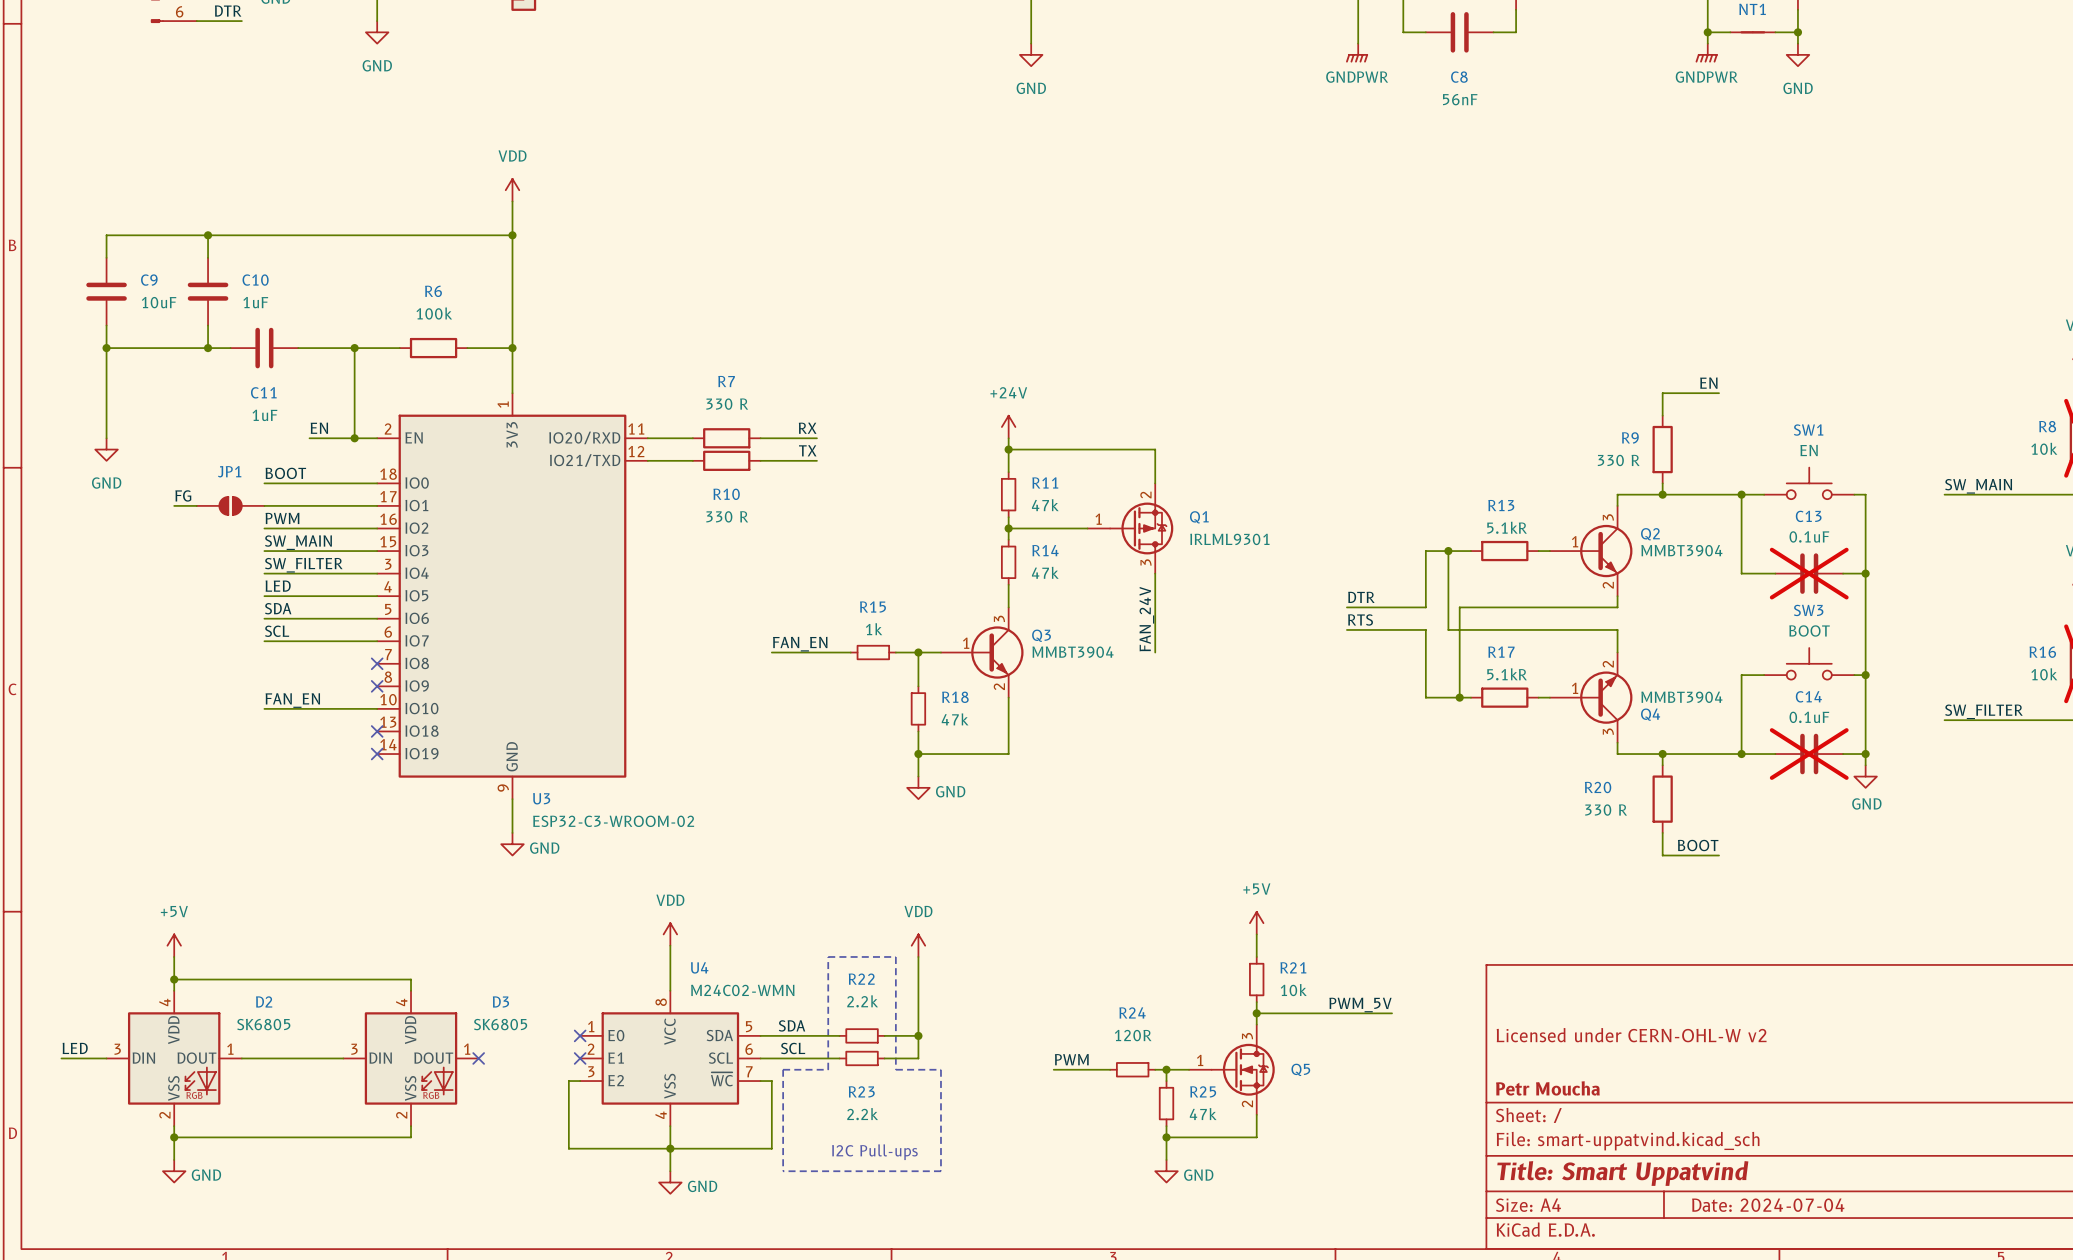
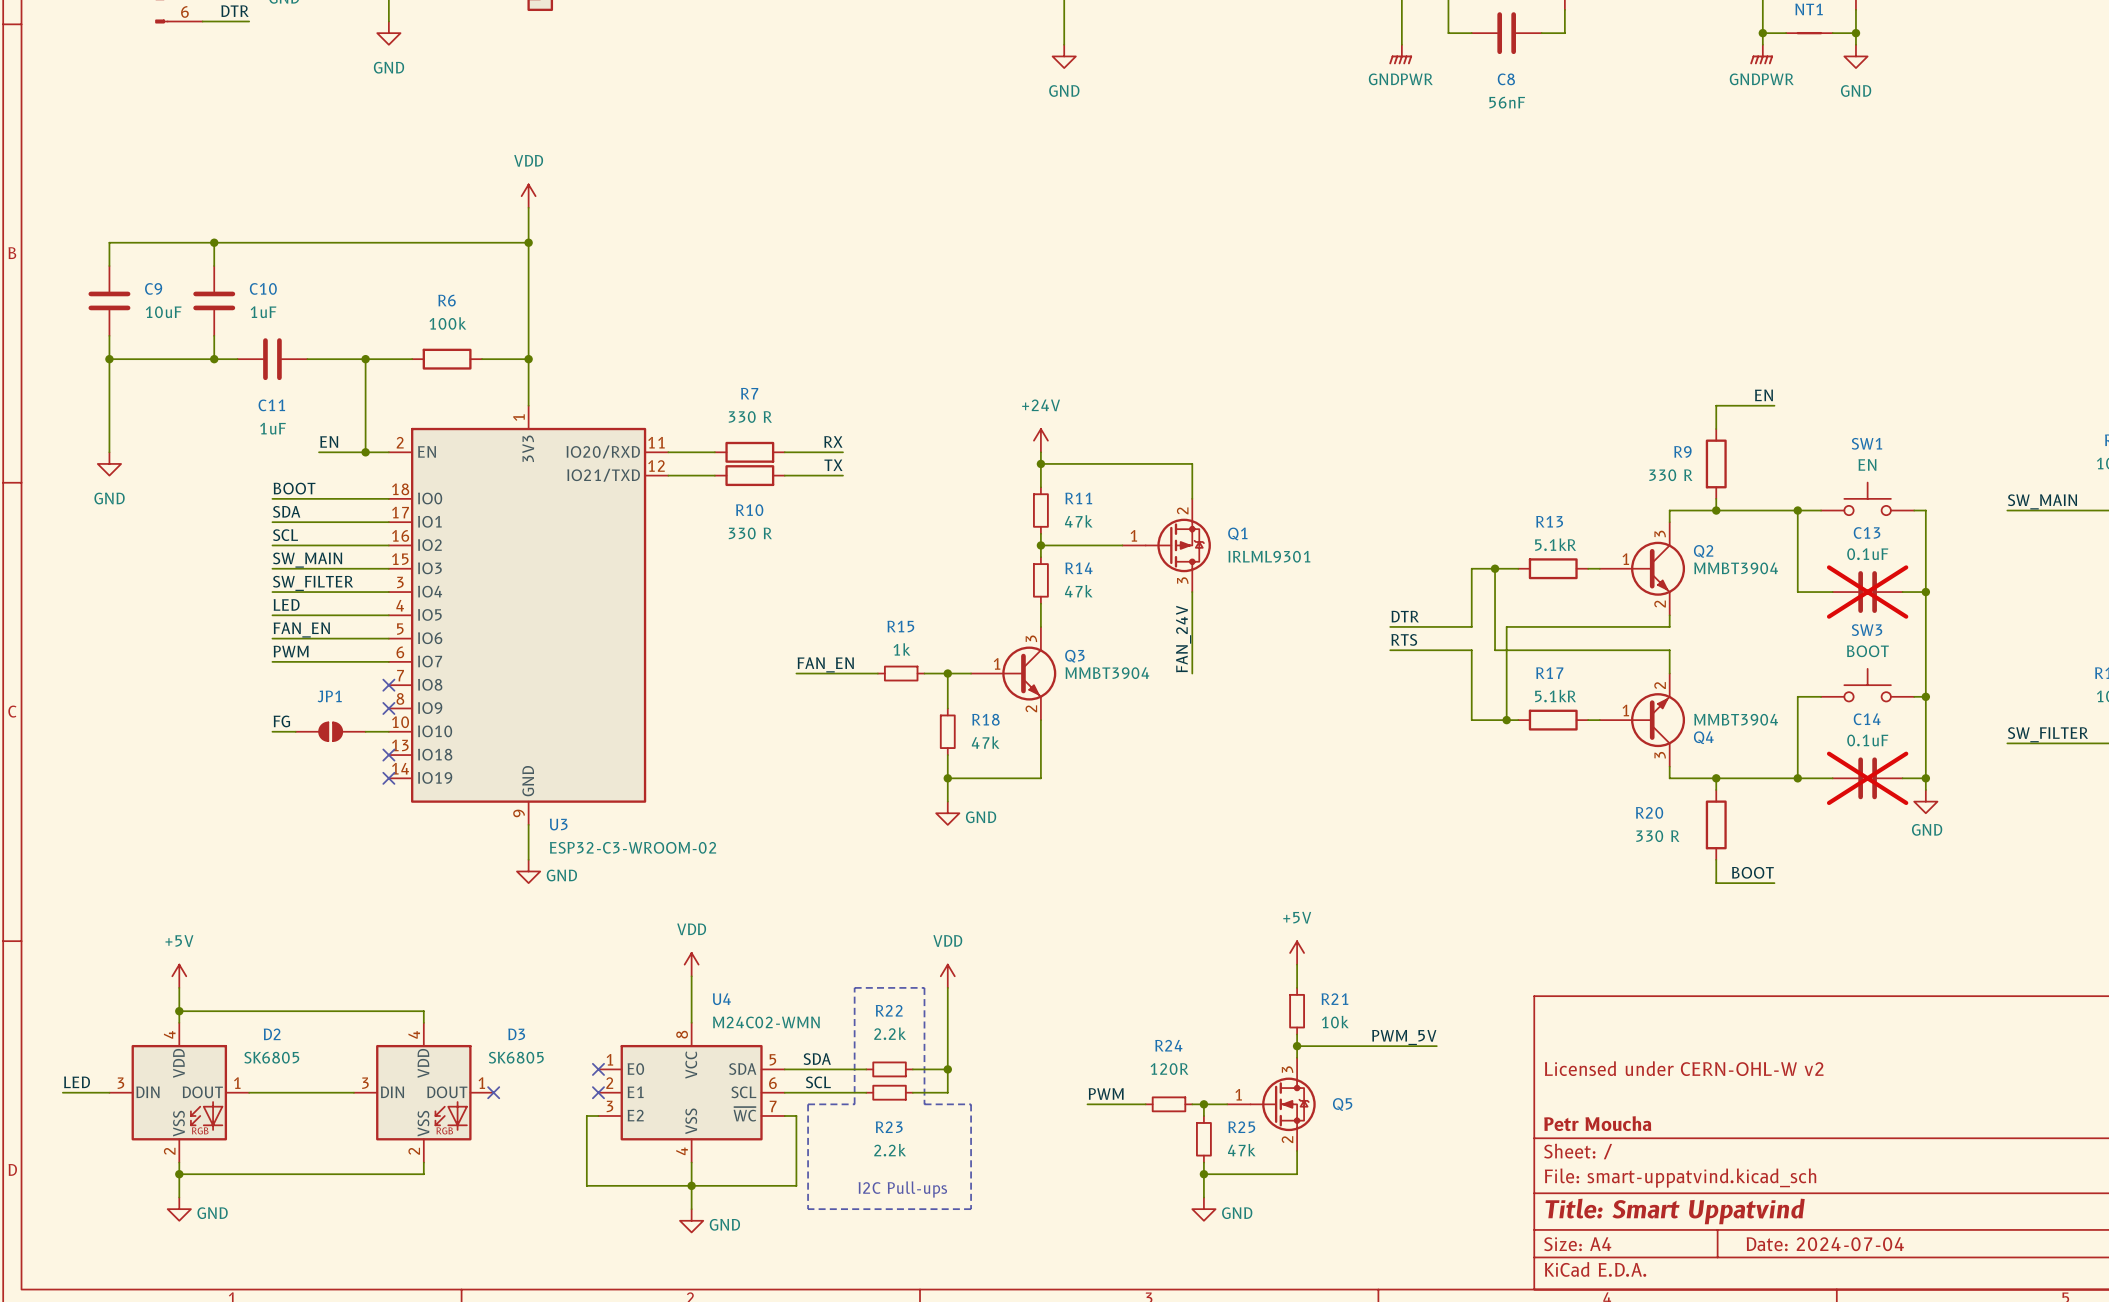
label: FG (183, 495) -> none
label: none -> SDA (286, 511)
wire: (174, 505) (196, 505) -> none
JP1 position: (230, 505) -> (330, 731)
label: PWM (282, 518) -> SCL (285, 535)
label: SDA (278, 608) -> FAN_EN (301, 629)
label: SCL (277, 631) -> PWM (291, 651)
label: FAN_EN (292, 700) -> FG (281, 721)

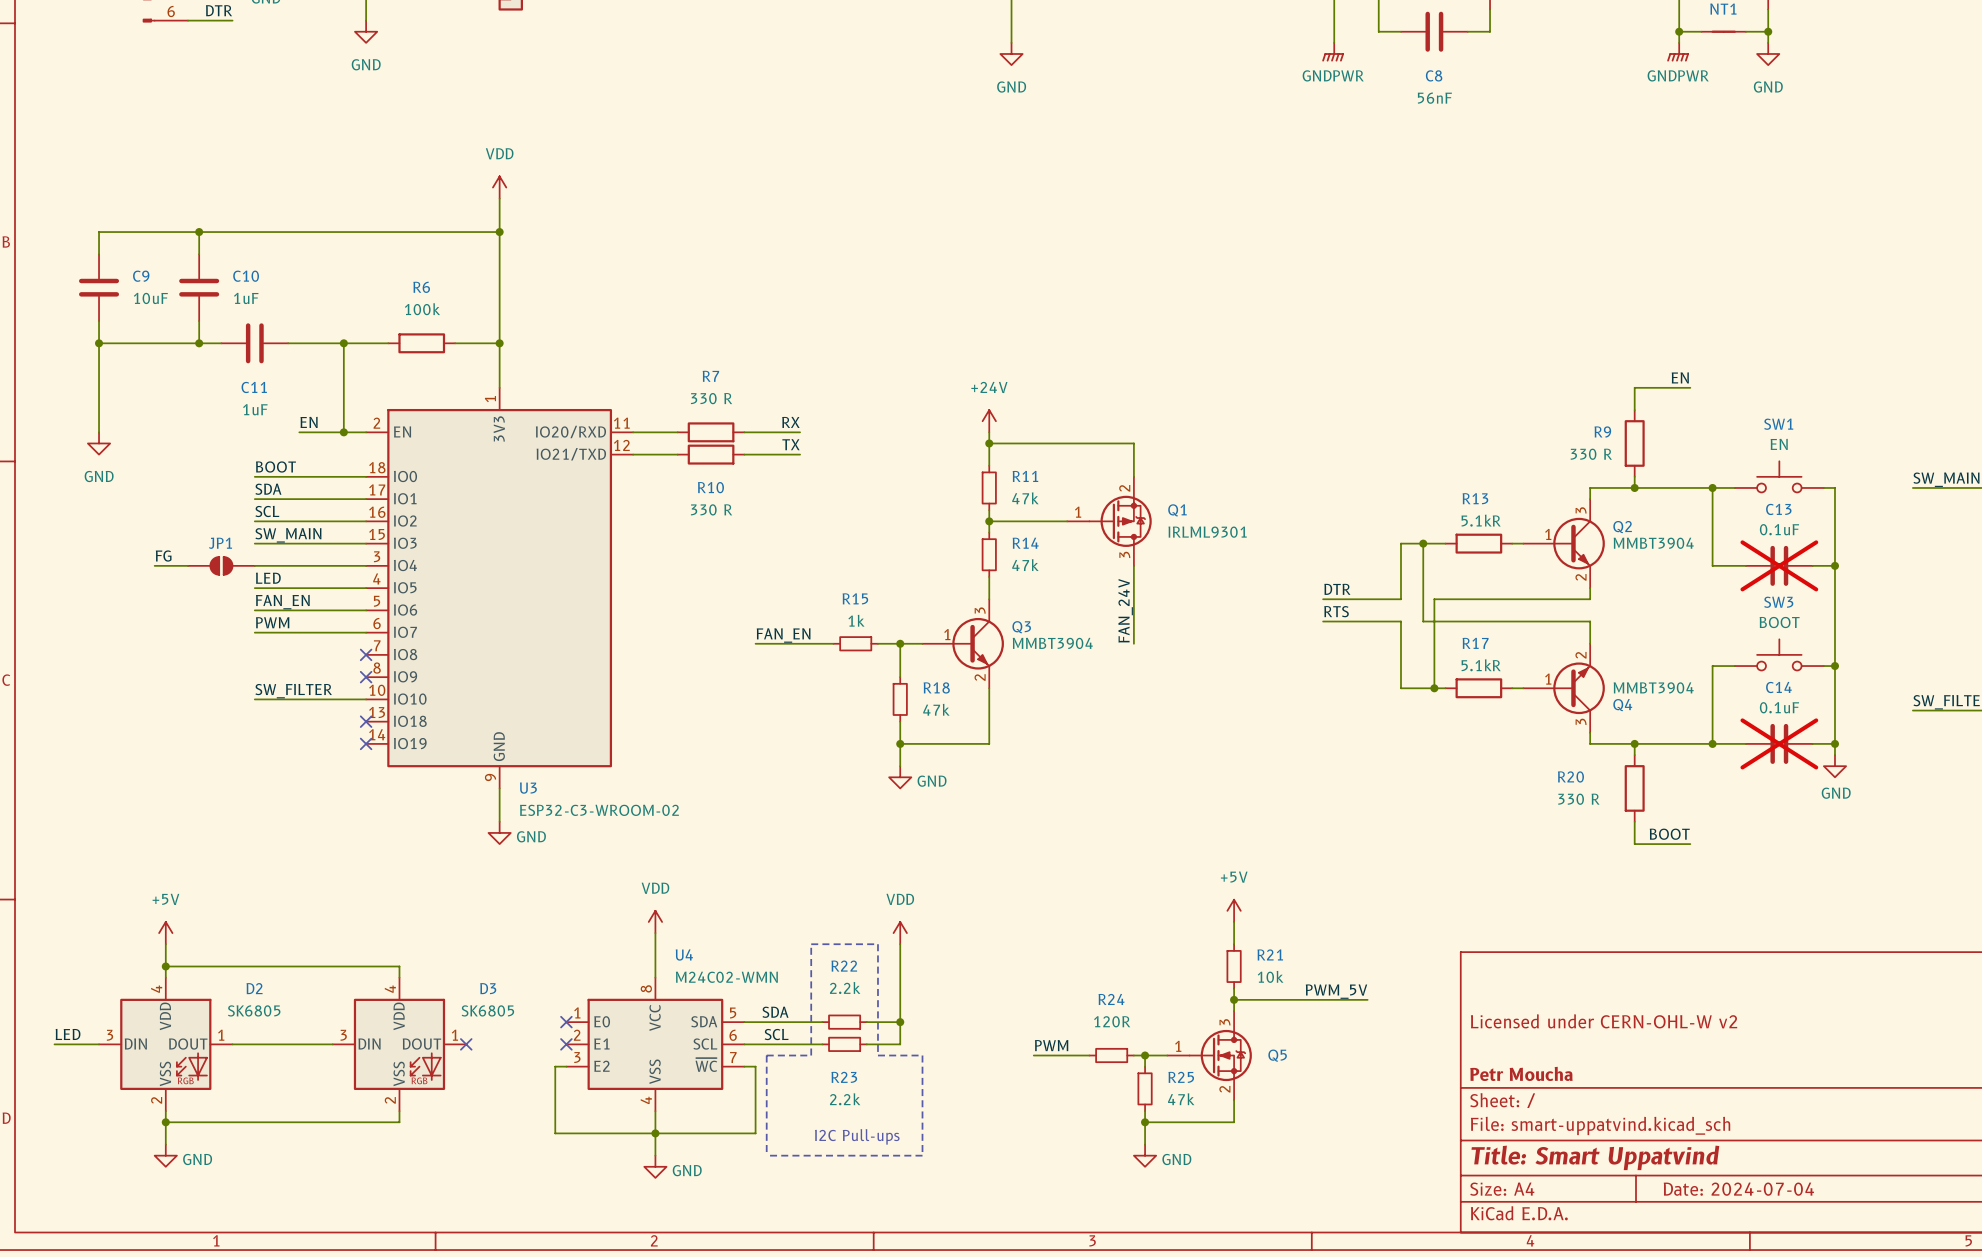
label: none -> FG (163, 556)
label: SW_FILTER (313, 583) -> none
wire: none -> (154, 565) (188, 565)
JP1 name position: JP1 (329, 696) -> JP1 (220, 543)
label: FG (281, 721) -> SW_FILTER (293, 691)
JP1 position: (330, 731) -> (221, 565)

